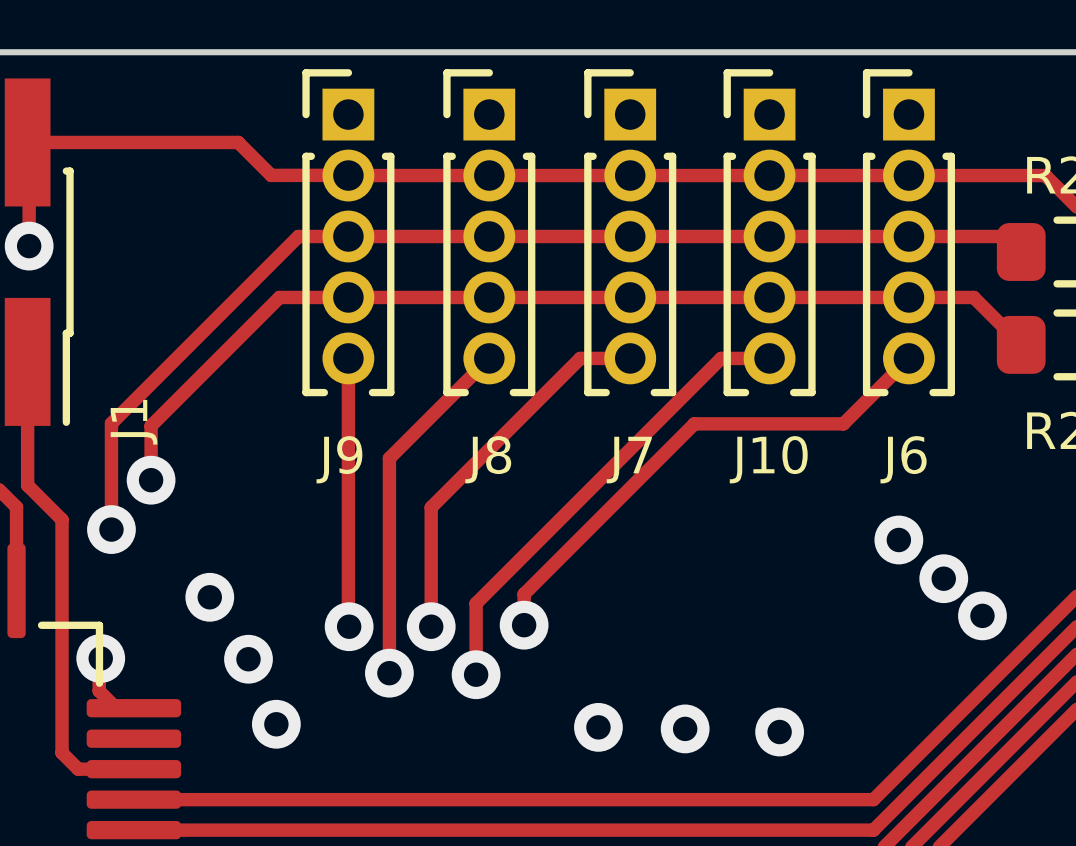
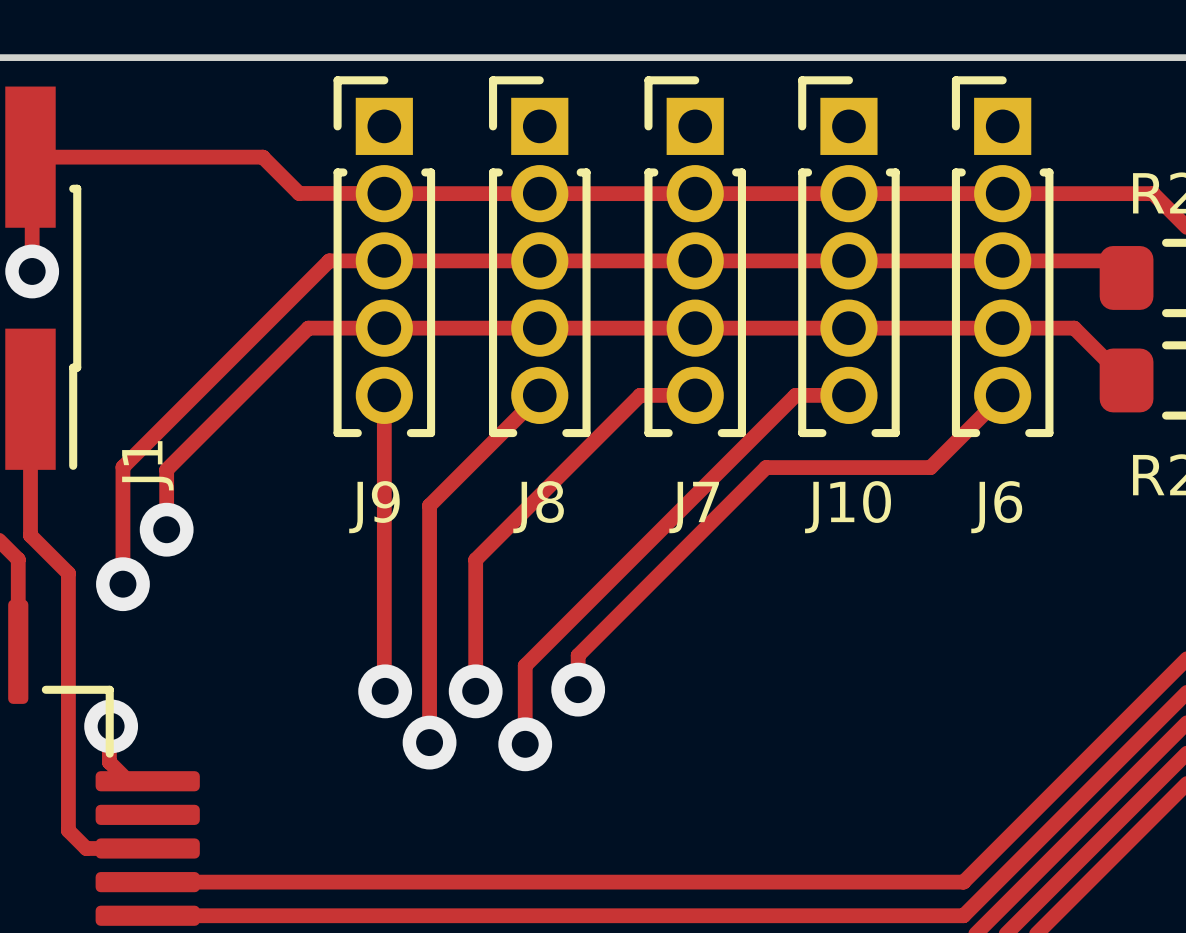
via: (898, 540) -> none
via: (943, 578) -> none
via: (209, 597) -> none
via: (982, 615) -> none
via: (248, 659) -> none
via: (276, 724) -> none
via: (598, 727) -> none
via: (685, 728) -> none
via: (779, 732) -> none

